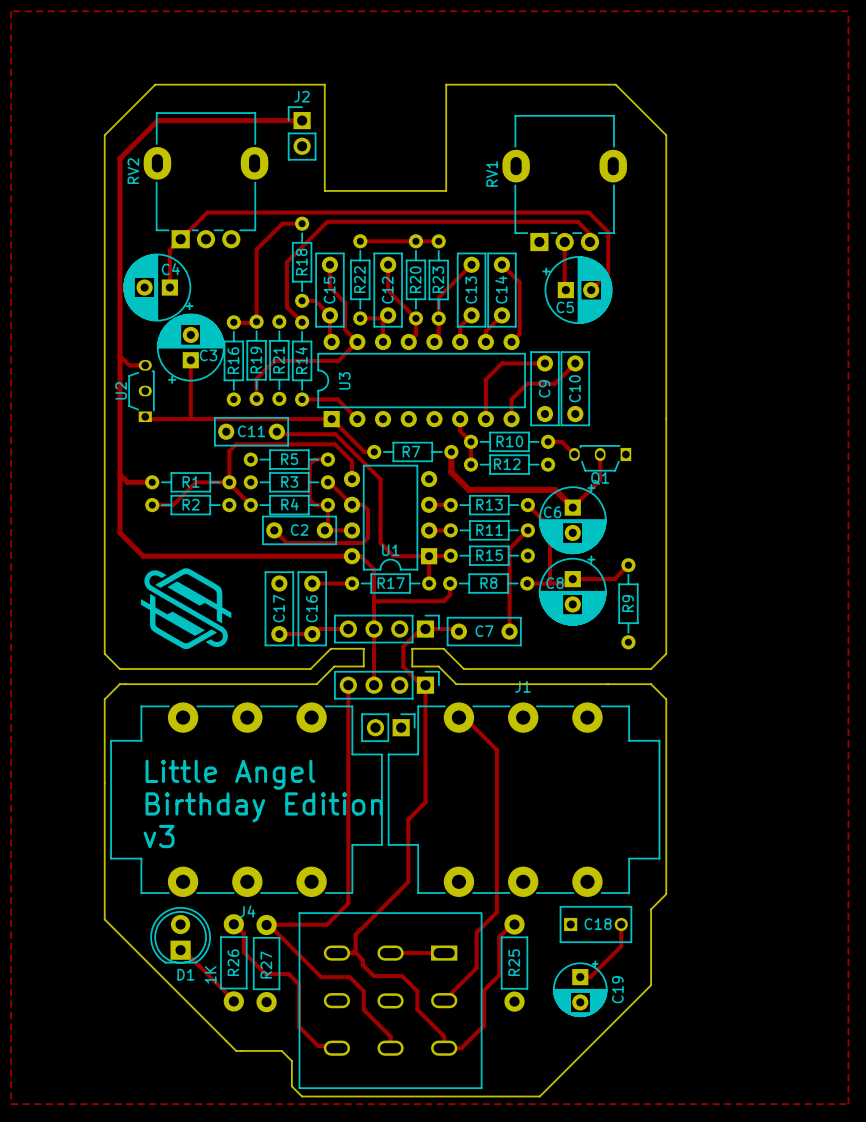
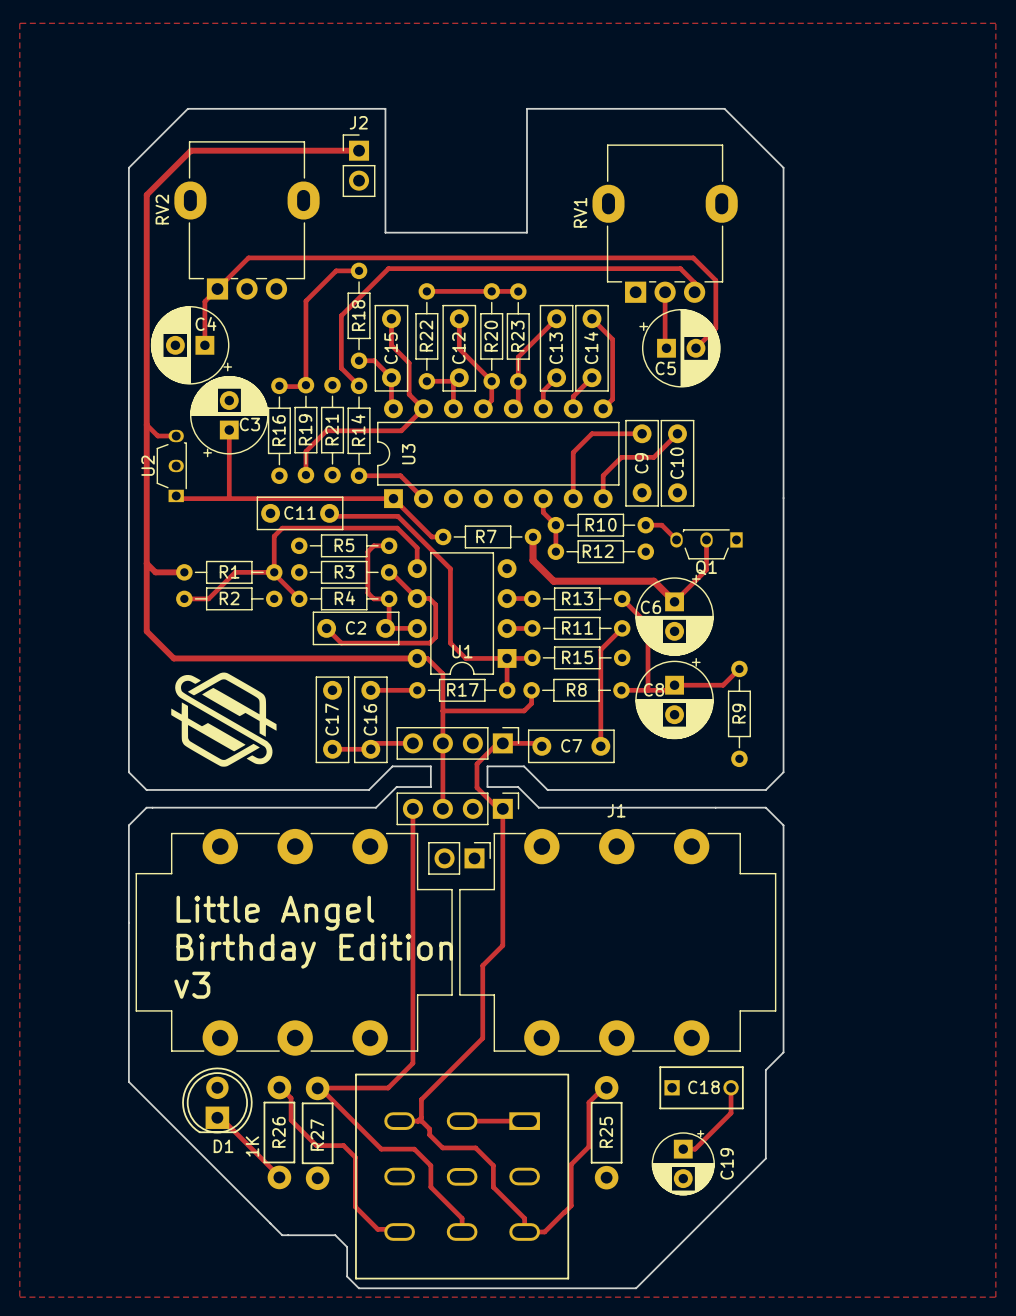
track: (464, 717) (496, 749) (496, 912) (476, 932) (476, 968) (444, 1000) -> none
J4 name: J4 (247, 911) -> none

